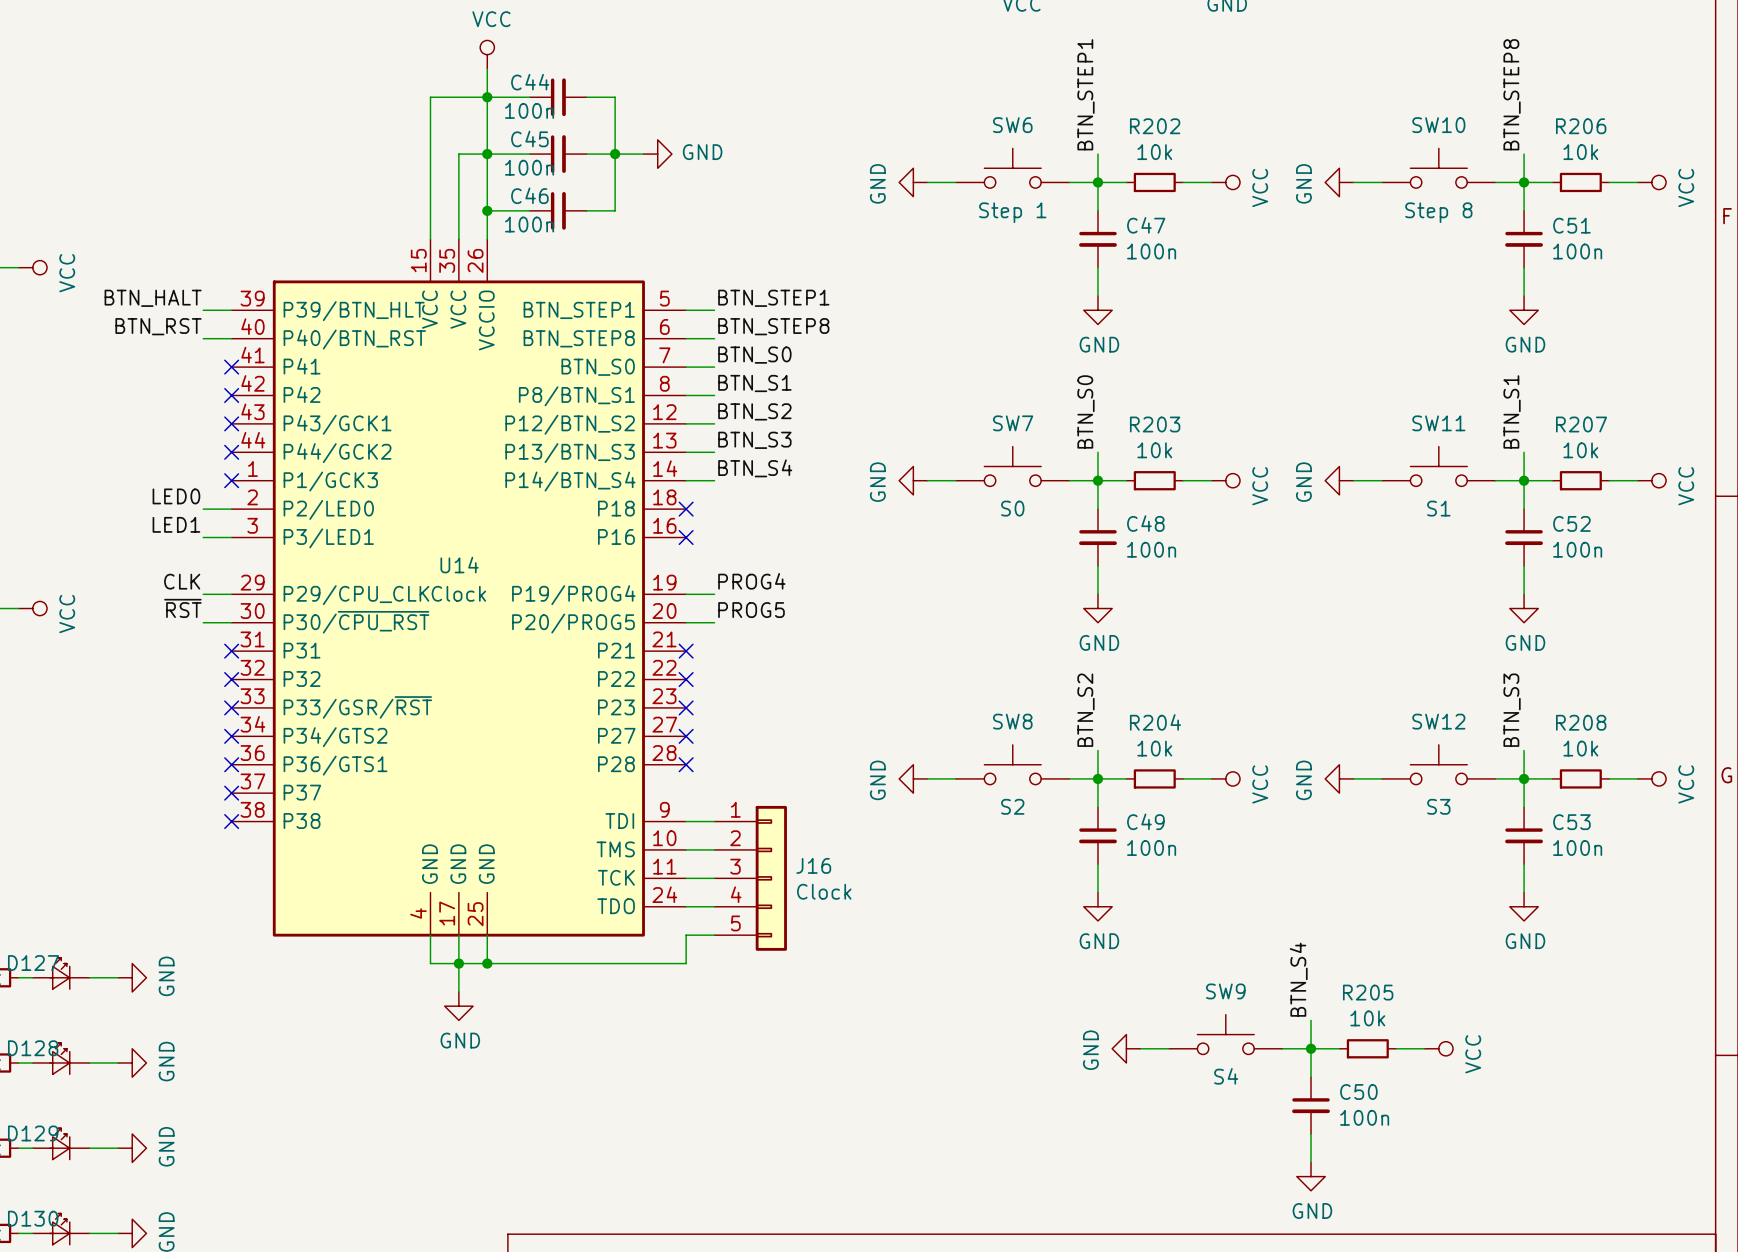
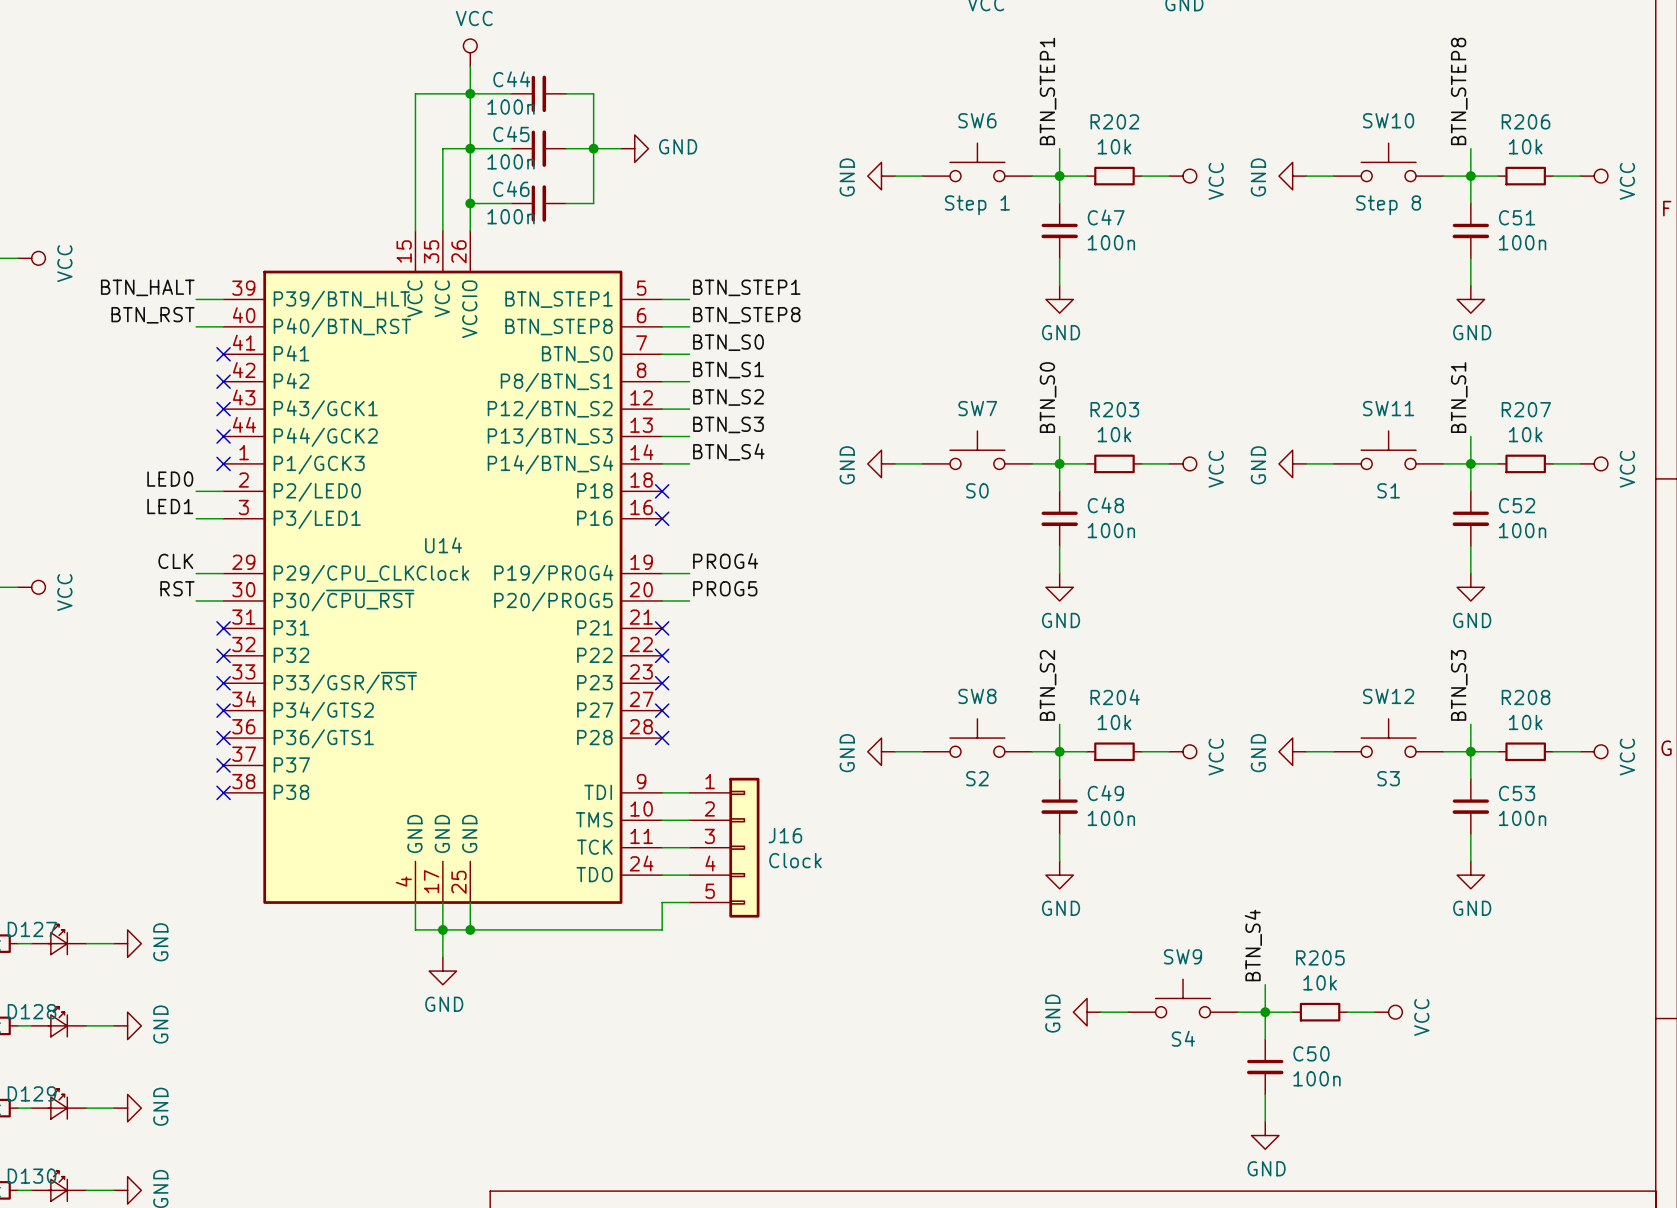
label: ~{RST} (182, 608) -> RST (177, 588)

